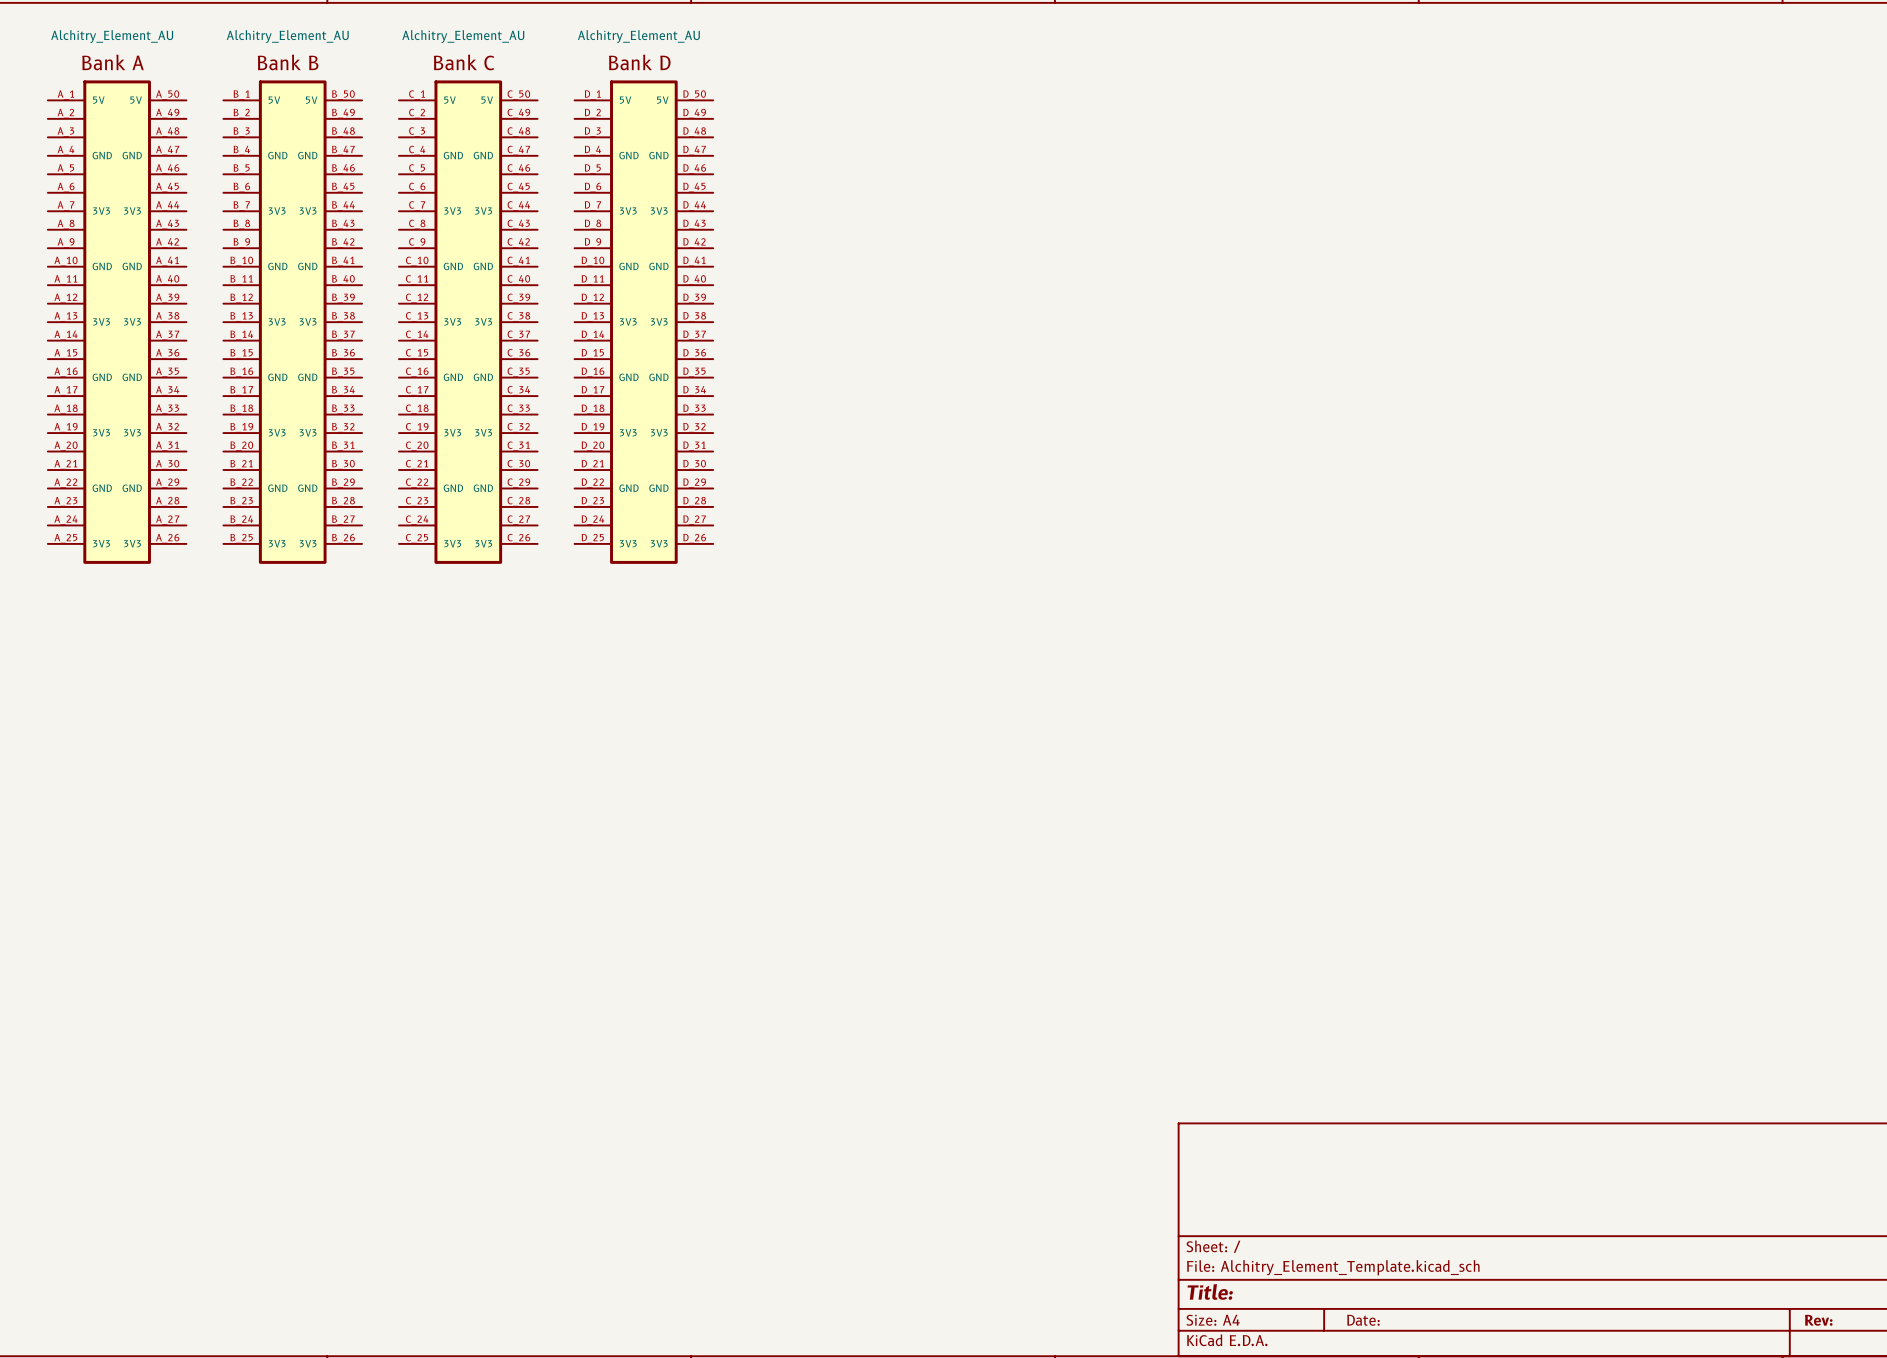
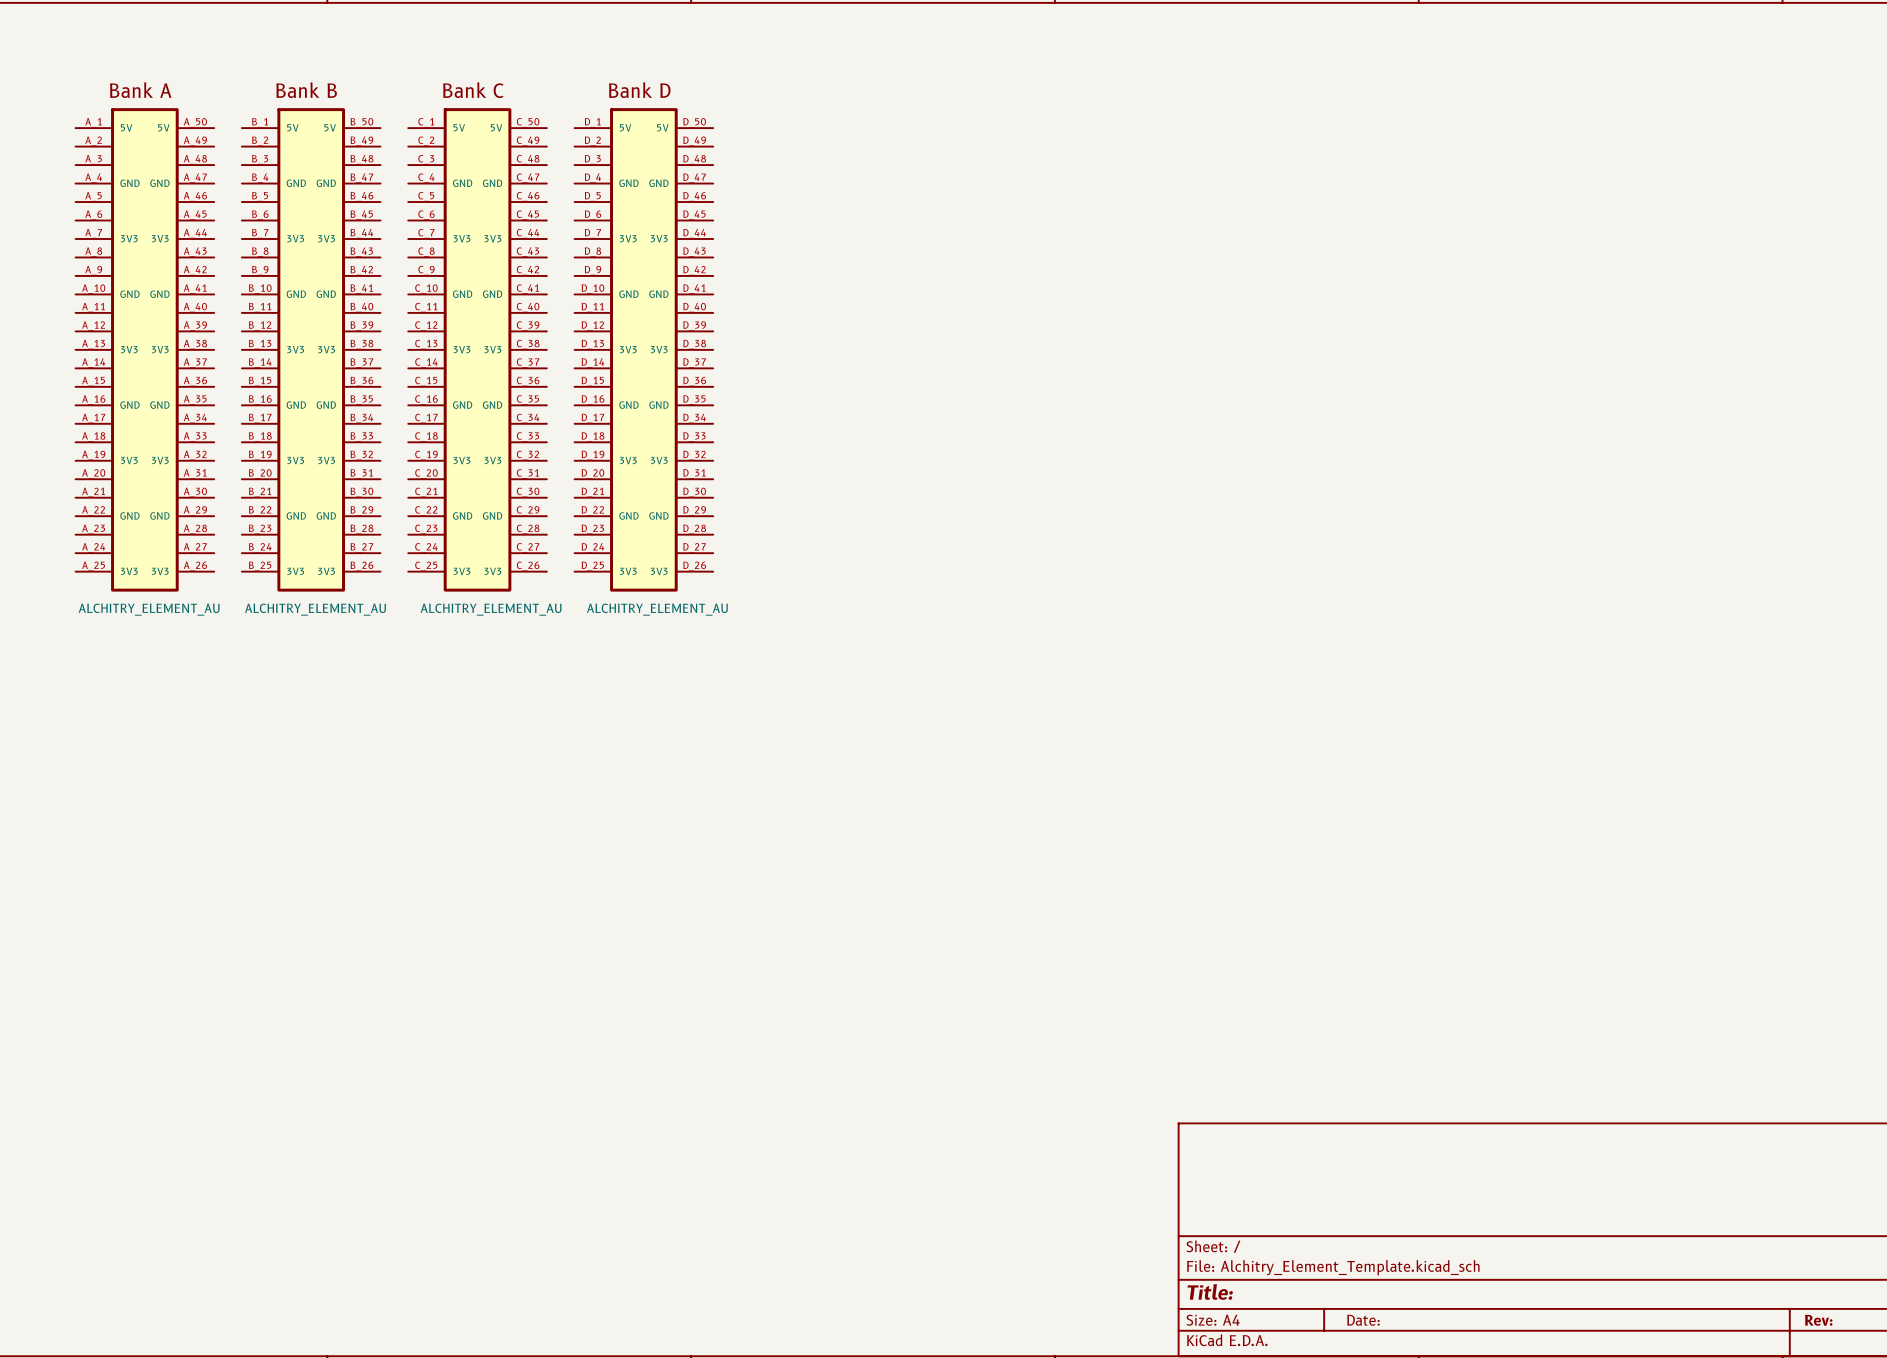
part: Alchitry_Element_AU (117, 322) -> none
part: Alchitry_Element_AU (292, 322) -> none
part: Alchitry_Element_AU (468, 322) -> none
part: Alchitry_Element_AU (643, 322) -> none
part: none -> ALCHITRY_ELEMENT_AU (144, 349)
part: none -> ALCHITRY_ELEMENT_AU (311, 349)
part: none -> ALCHITRY_ELEMENT_AU (477, 349)
part: none -> ALCHITRY_ELEMENT_AU (643, 349)

